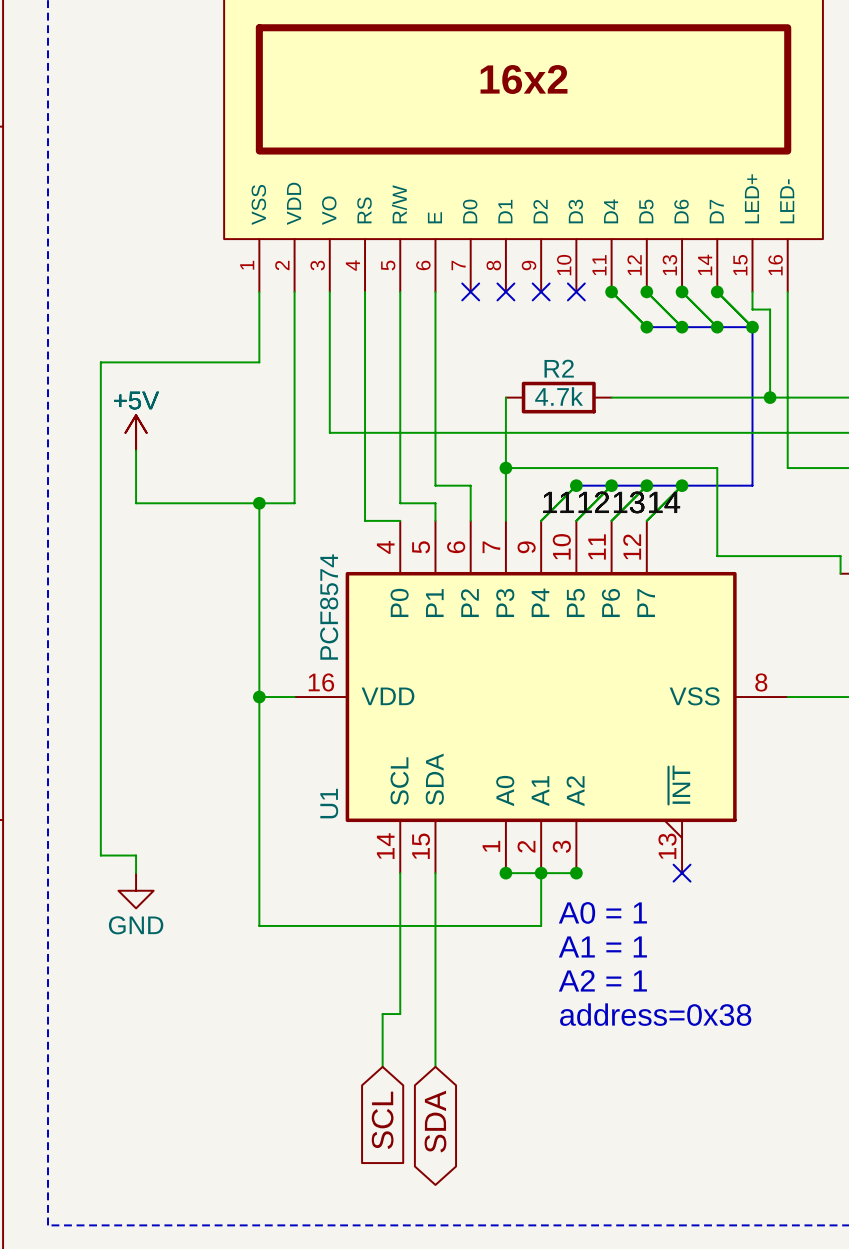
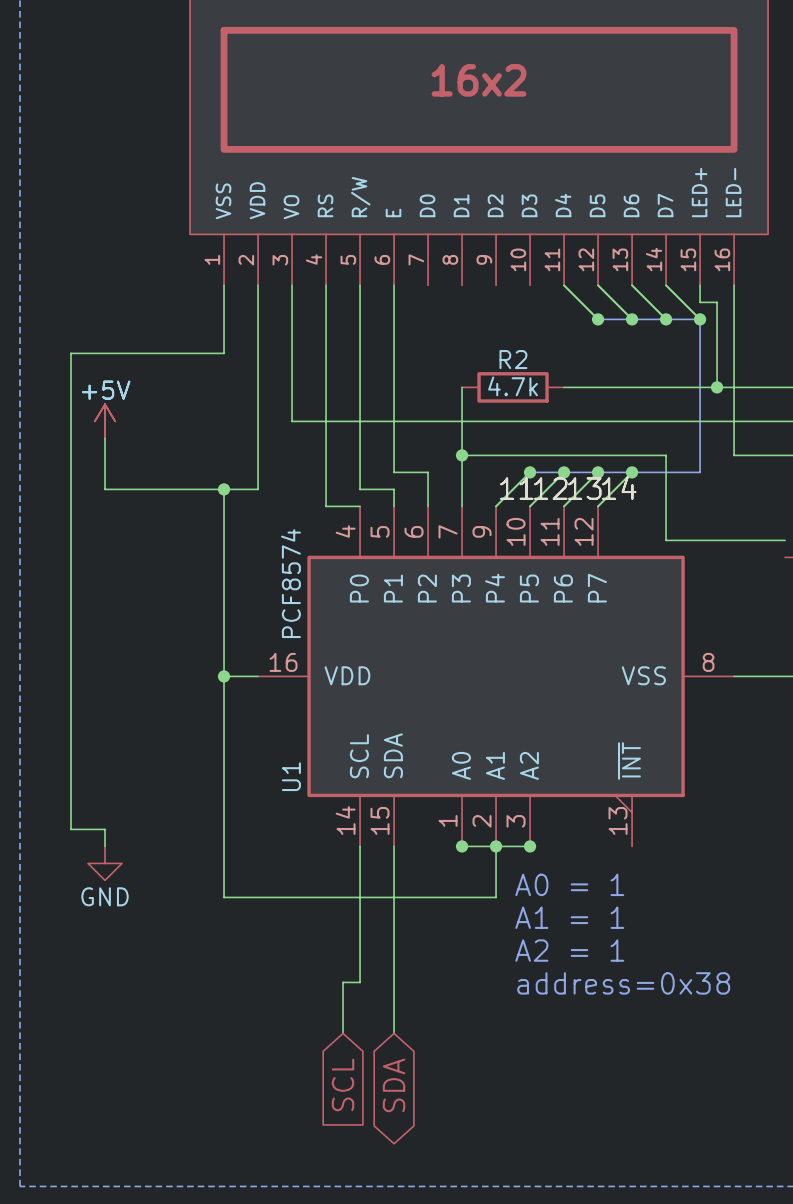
no-connect mark: (470, 291) -> none
no-connect mark: (505, 291) -> none
no-connect mark: (541, 291) -> none
no-connect mark: (576, 291) -> none
junction: (611, 291) -> none
junction: (646, 291) -> none
junction: (682, 291) -> none
junction: (717, 291) -> none
wire: (840, 556) (840, 573) -> none
no-connect mark: (682, 873) -> none

